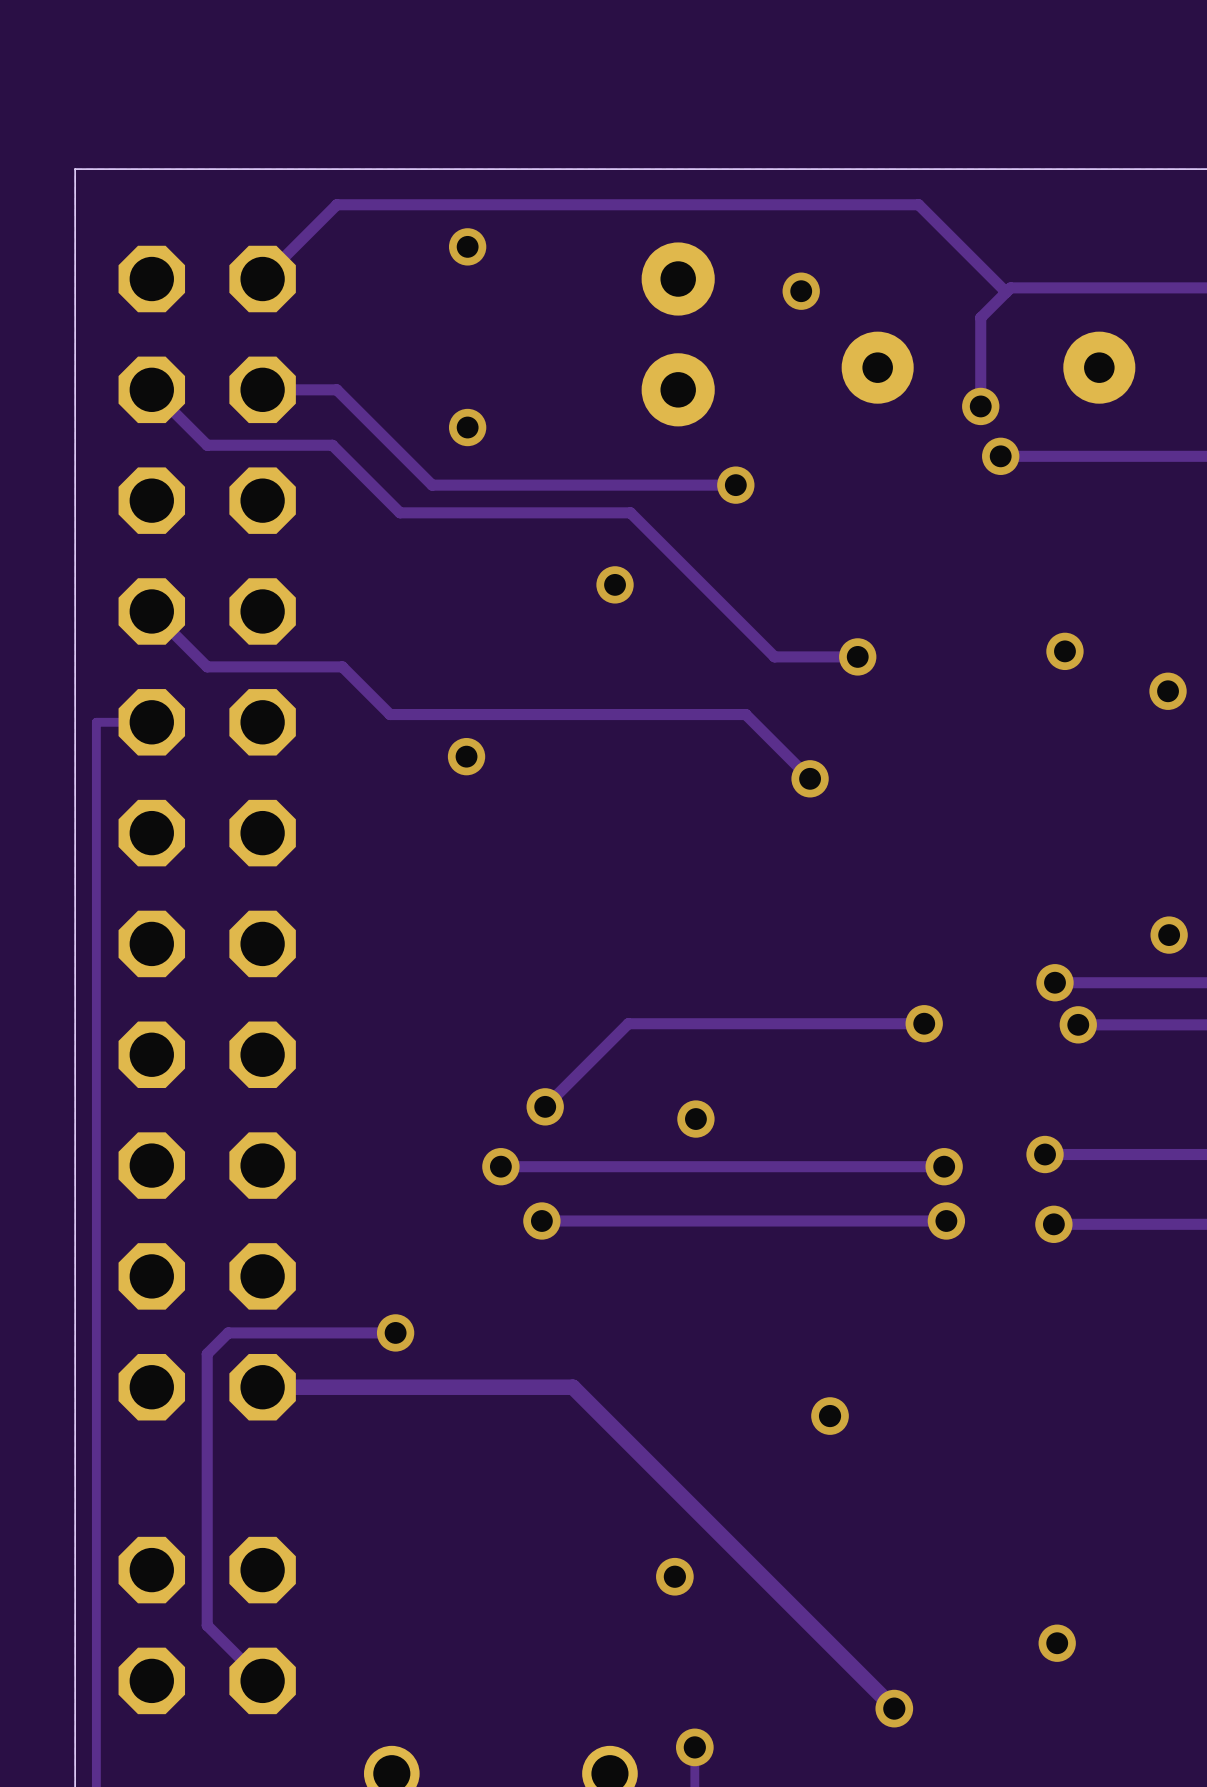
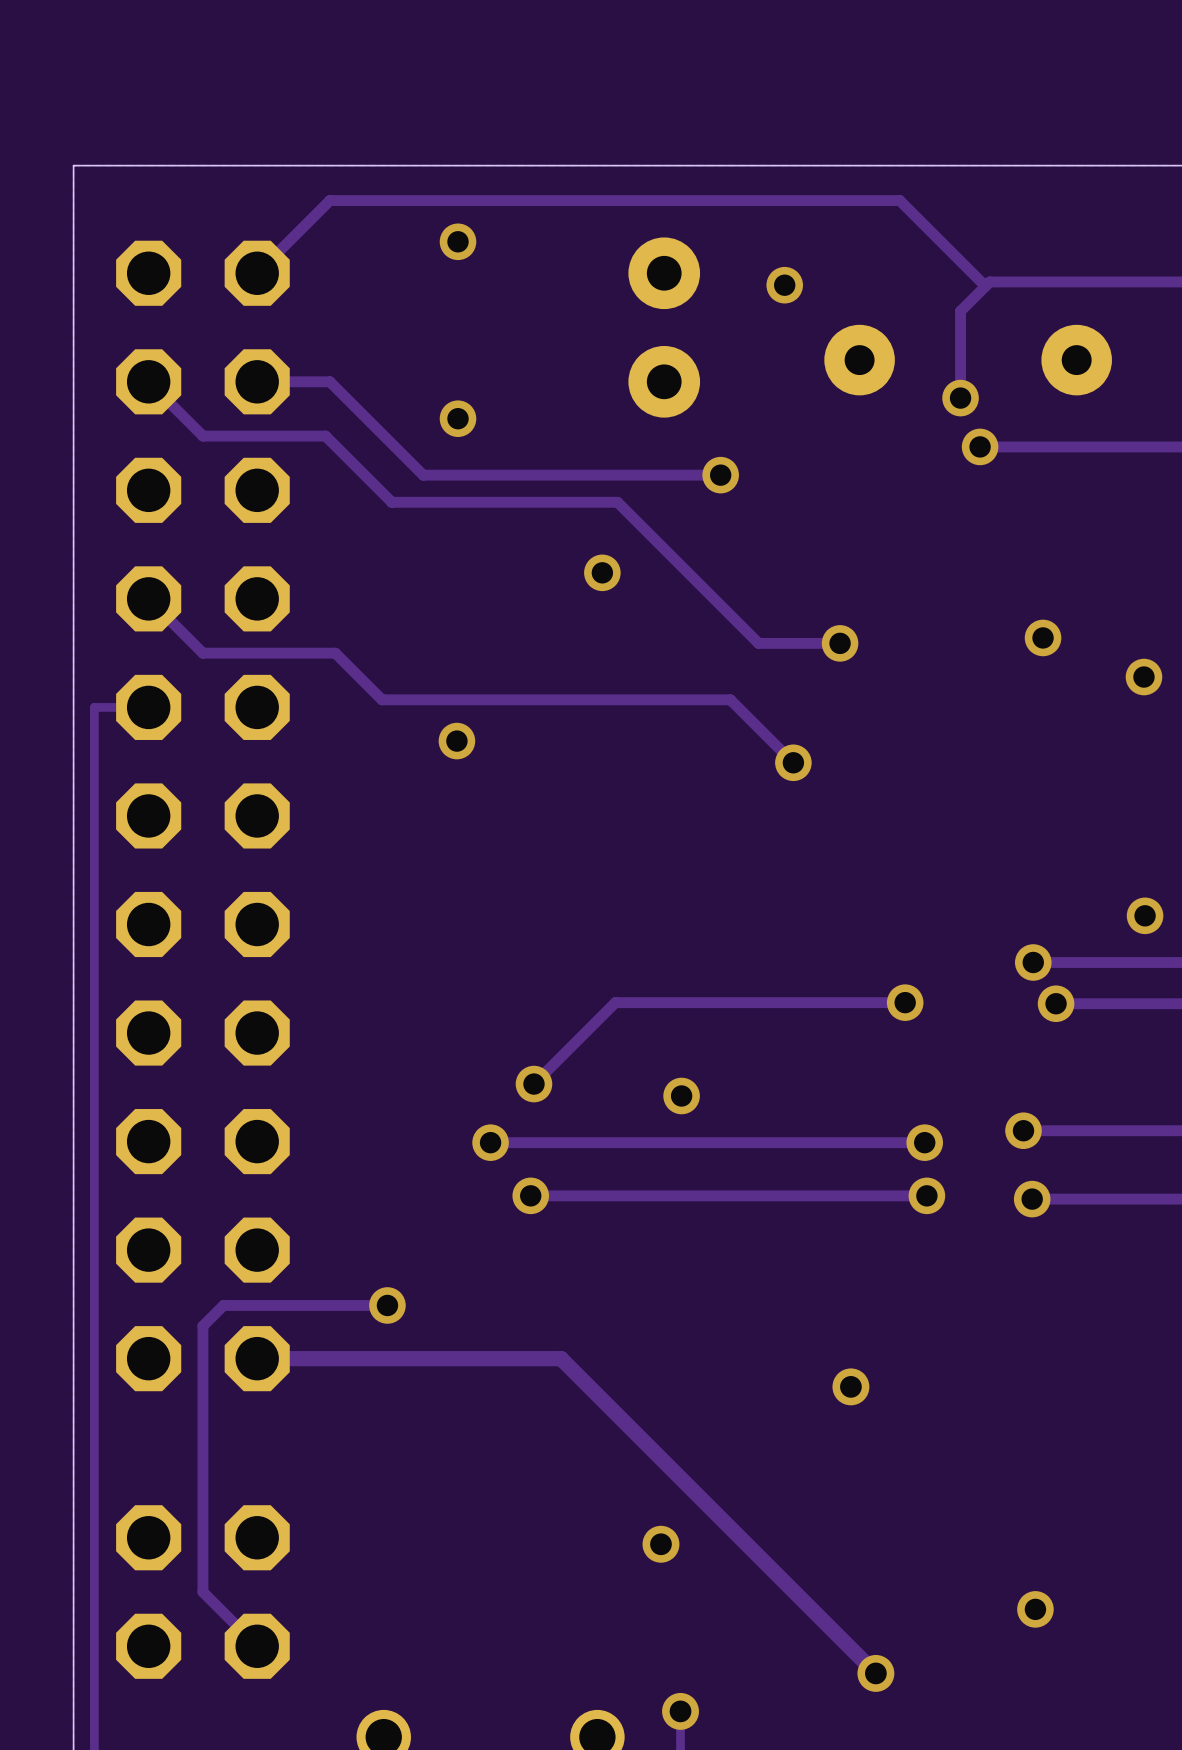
via position: (830, 1416) -> (850, 1386)

